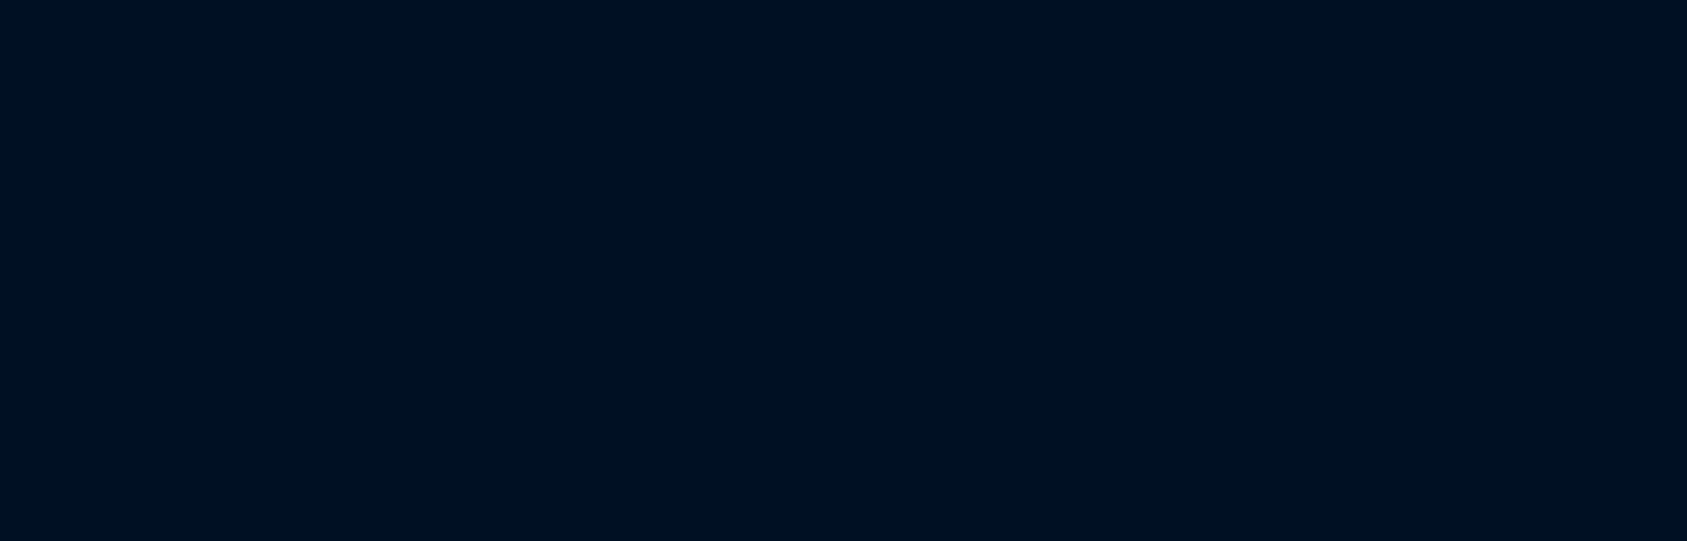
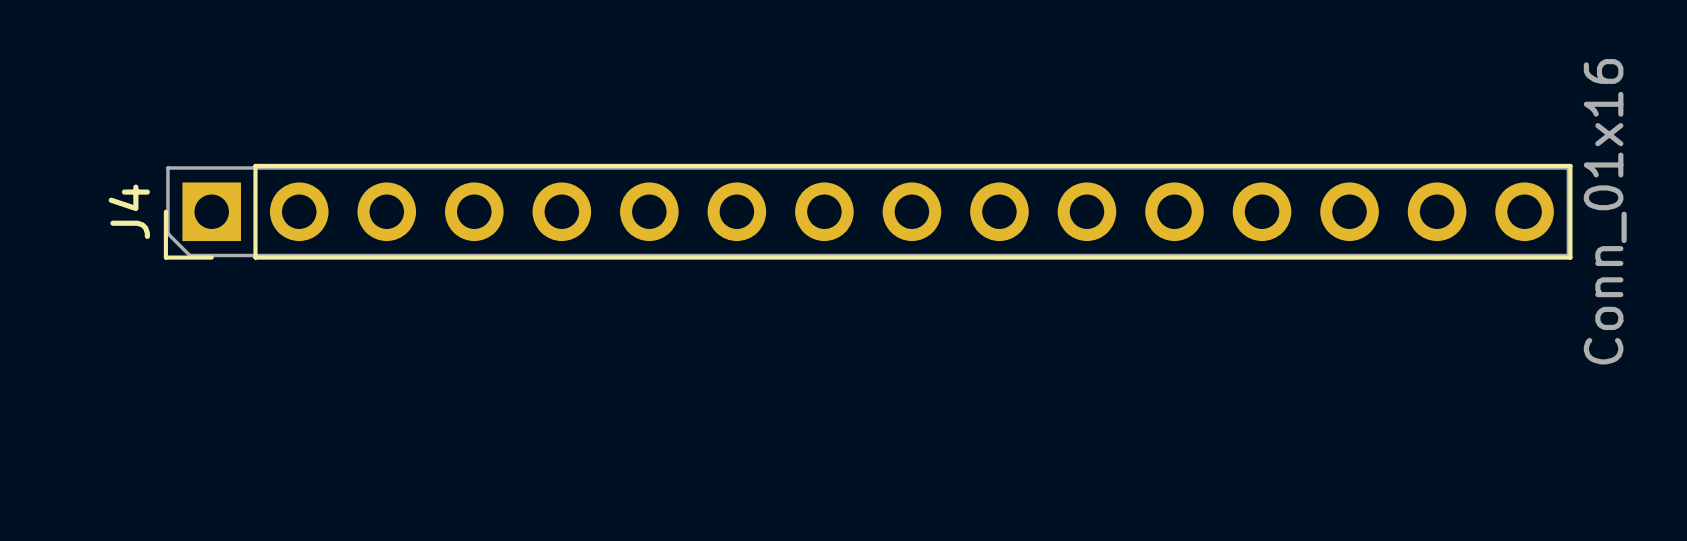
J4: none -> Conn_01x16 (868, 211)

